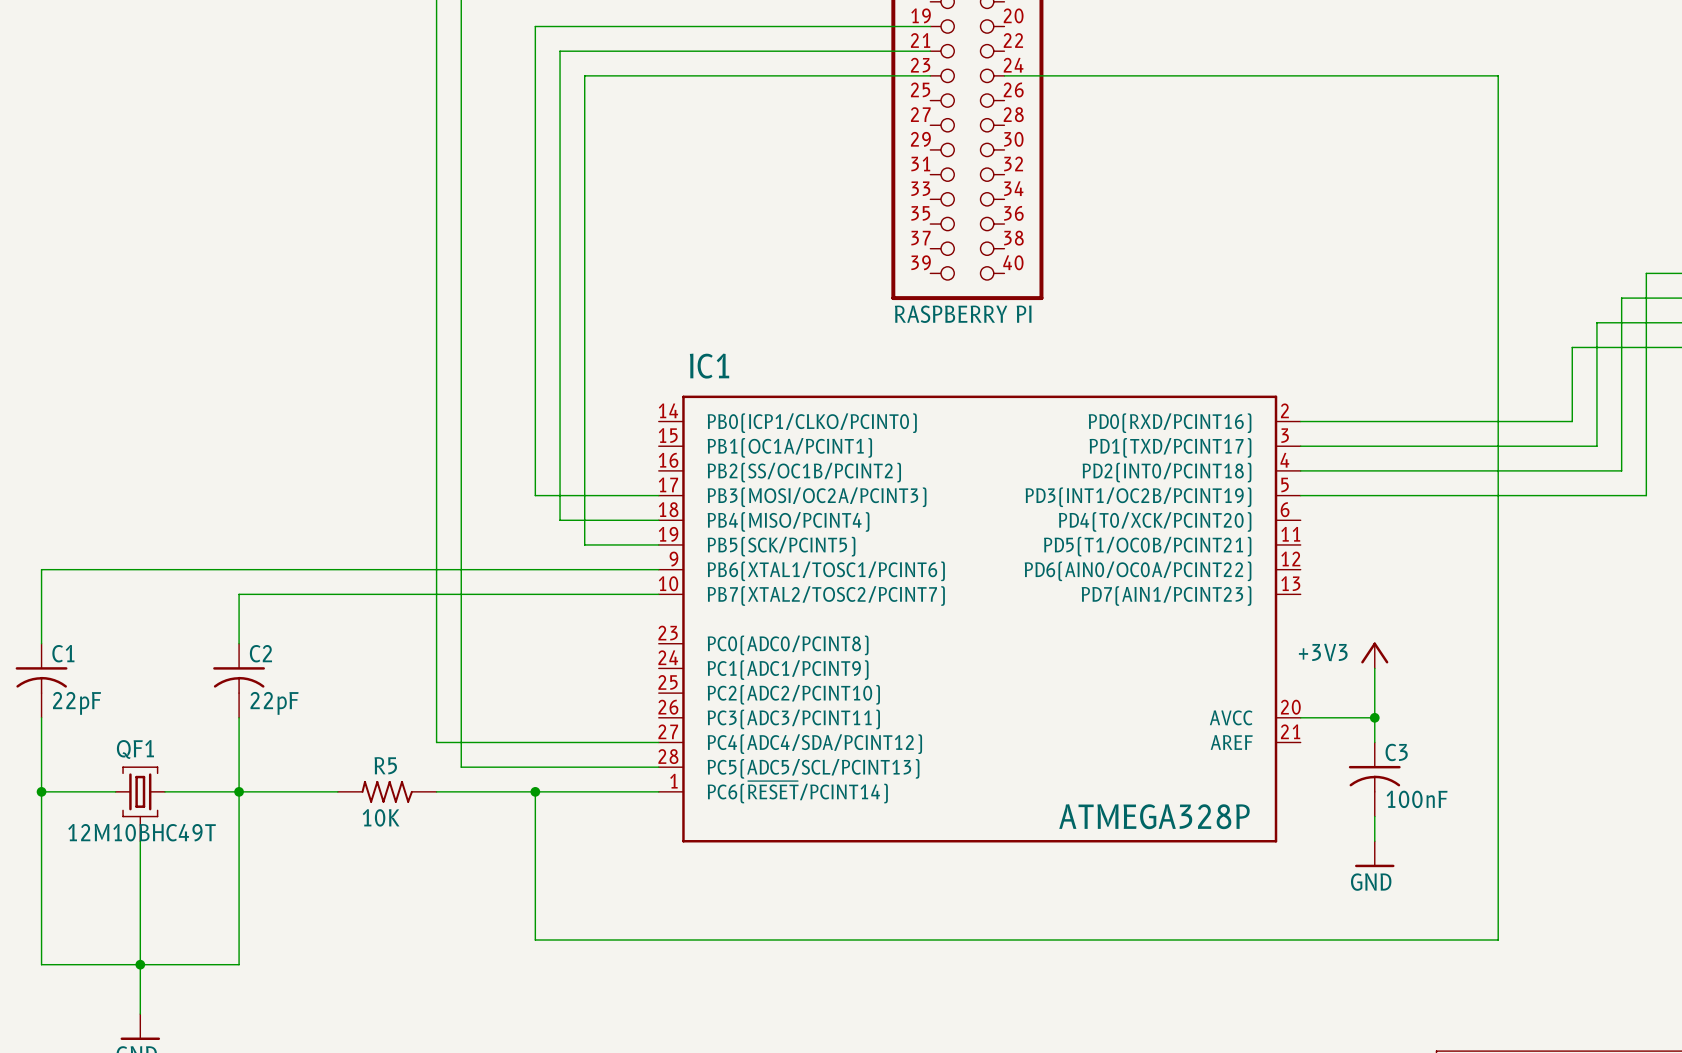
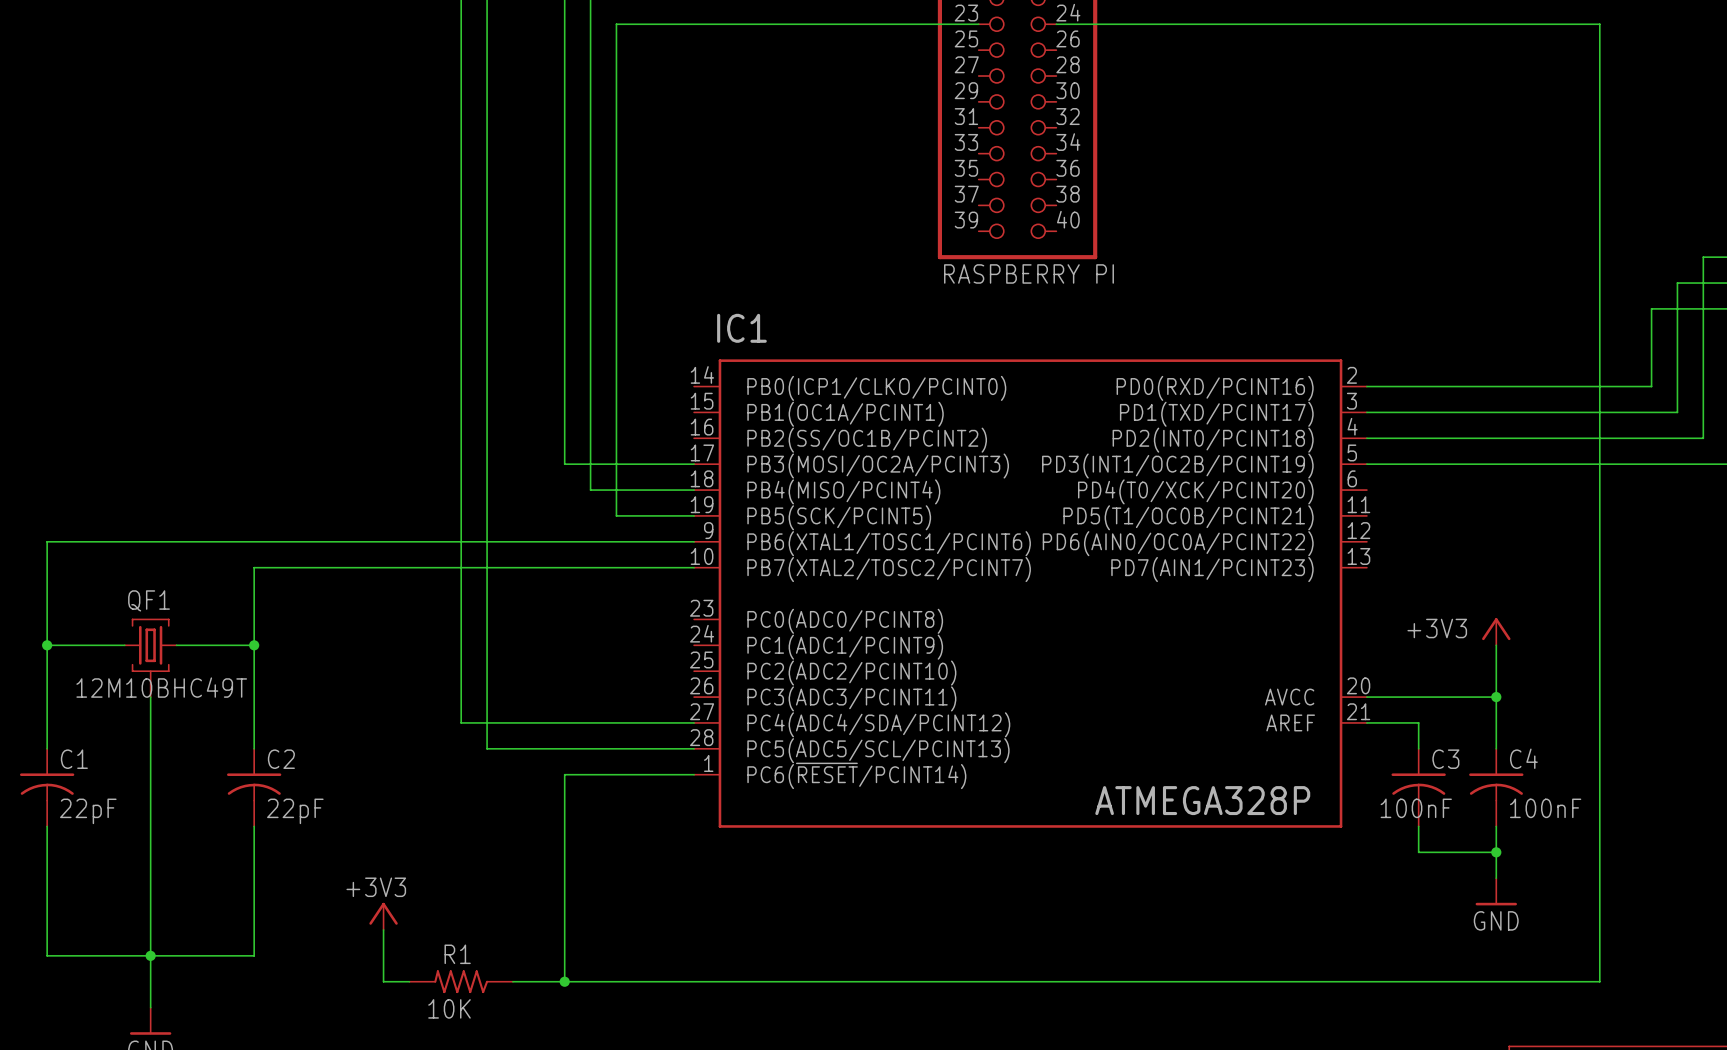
wire: (1498, 75) (1498, 940) (535, 940) -> (1573, 24) (1599, 24) (1599, 981) (512, 981)
power symbol position: +3V3 (1374, 655) -> +3V3 (1496, 631)
junction: none -> (47, 645)
wire: none -> (176, 645) (254, 645)
junction: none -> (254, 645)
wire: (1374, 668) (1374, 742) -> none
wire: none -> (1496, 645) (1496, 748)
C1 position: (41, 680) -> (47, 787)
C2 position: (239, 680) -> (254, 787)
wire: none -> (150, 697) (150, 826)
wire: none -> (1444, 697) (1496, 697)
junction position: (1374, 717) -> (1496, 697)
wire: none -> (1366, 722) (1418, 722) (1418, 748)
C3 position: (1374, 779) -> (1418, 787)
wire: (41, 791) (115, 791) -> (47, 645) (124, 645)
junction: (41, 791) -> none
wire: (165, 791) (337, 791) -> none
junction: (239, 791) -> none
R5: 10K (387, 791) -> none
wire: (436, 791) (535, 791) -> none
junction: (535, 791) -> none
C3 value position: 100nF (1417, 799) -> 100nF (1416, 808)
QF1 position: (140, 803) -> (150, 657)
C4: none -> 100nF (1496, 787)
wire: (1374, 816) (1374, 841) -> none
wire: none -> (1418, 826) (1418, 852) (1496, 852)
wire: none -> (1496, 826) (1496, 878)
power symbol position: GND (1374, 854) -> GND (1496, 891)
junction: none -> (1496, 852)
power symbol: none -> +3V3 (383, 916)
wire: none -> (383, 929) (383, 981) (409, 981)
wire: none -> (564, 929) (564, 981)
R1: none -> 10K (461, 981)
junction: none -> (564, 981)

